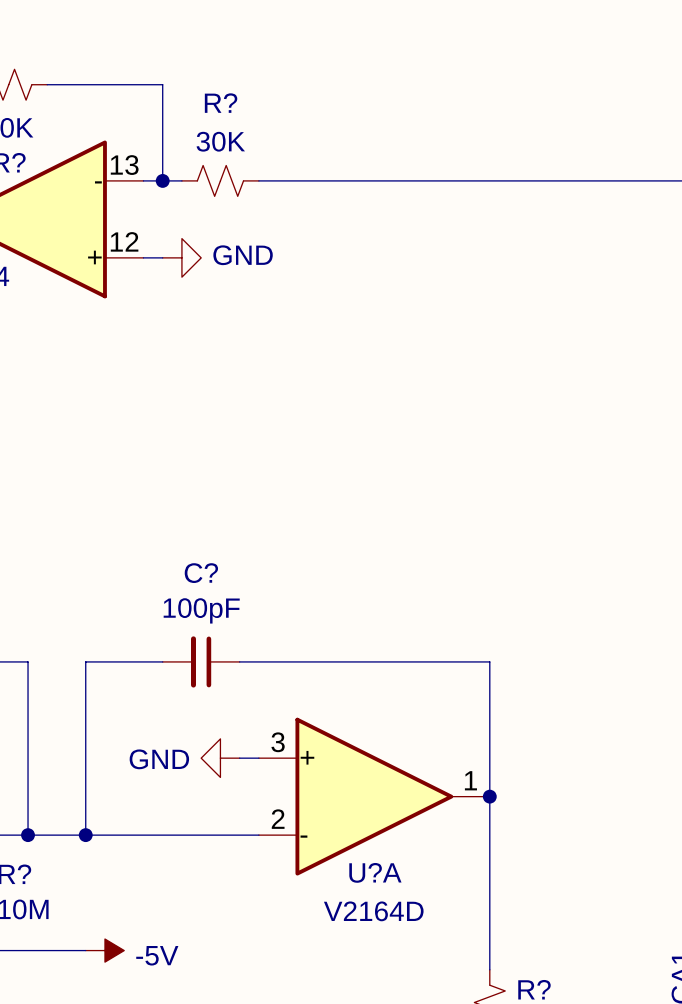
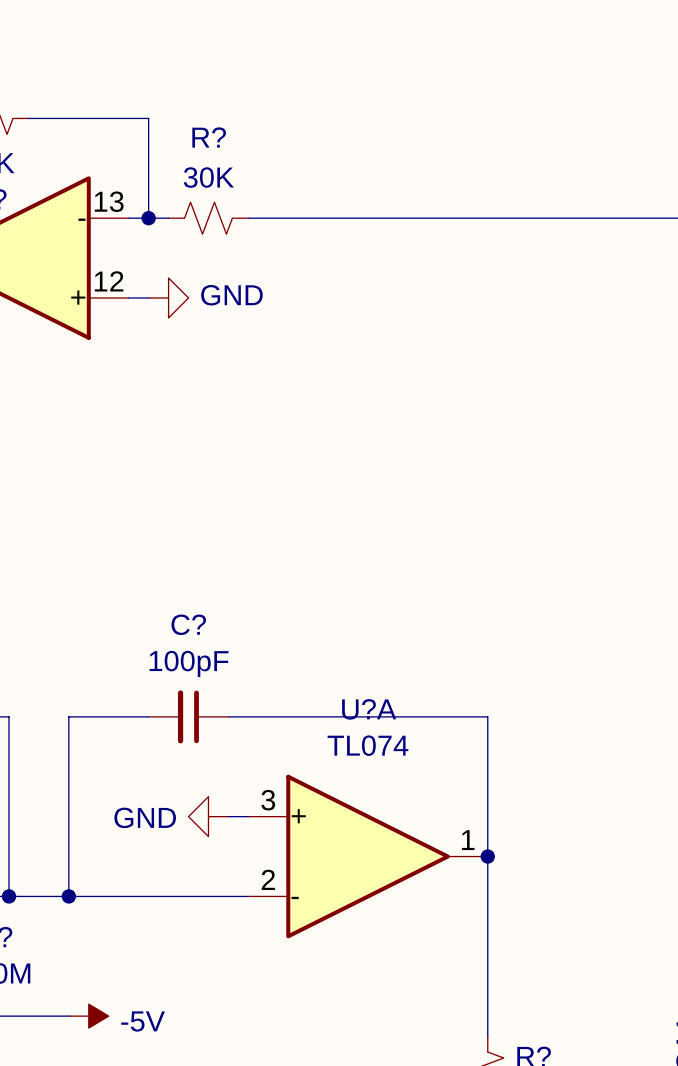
U?A name position: U?A (375, 872) -> U?A (369, 709)
U?A value: V2164D (373, 911) -> TL074 (367, 745)

